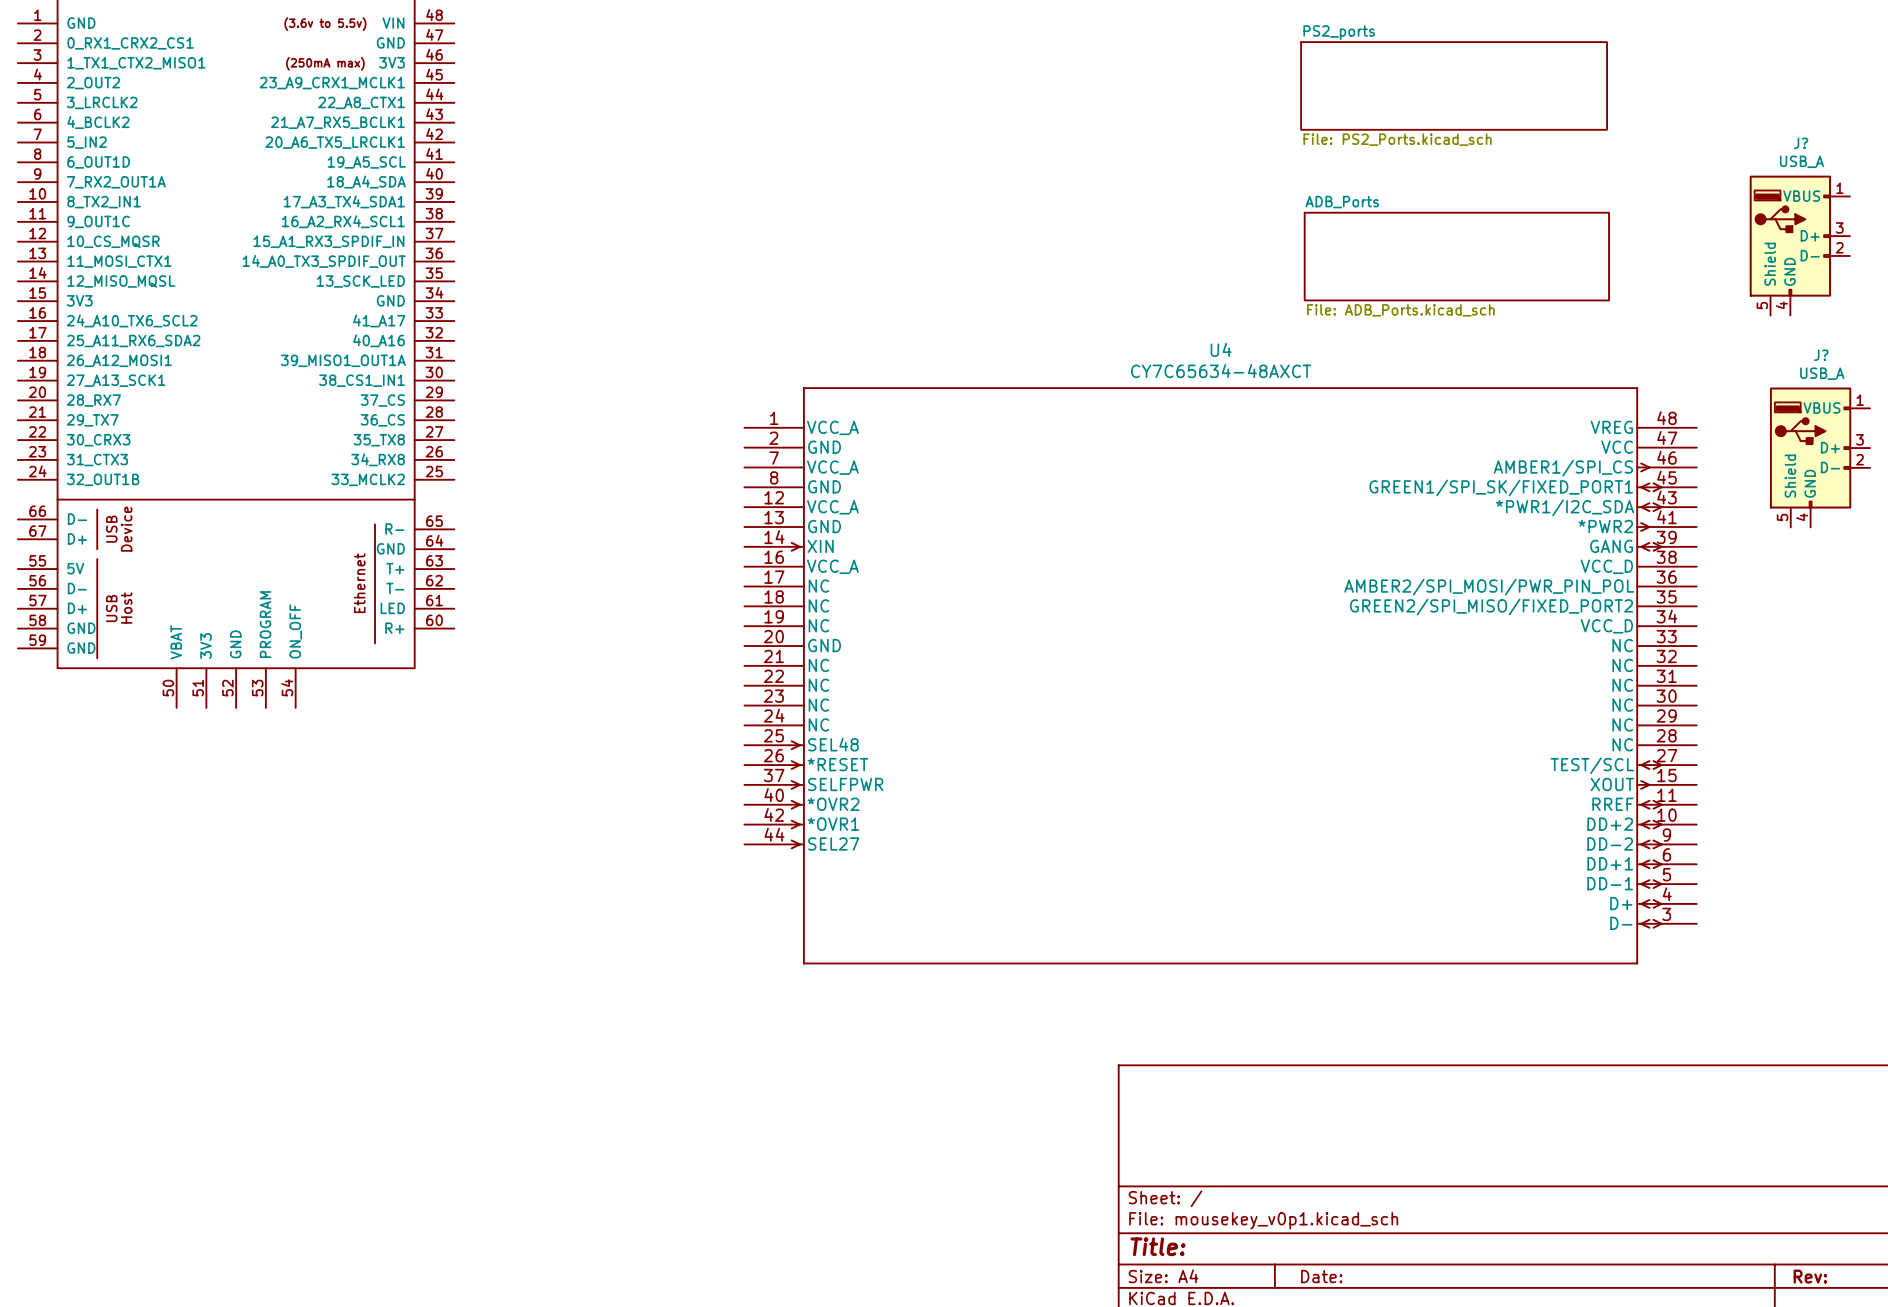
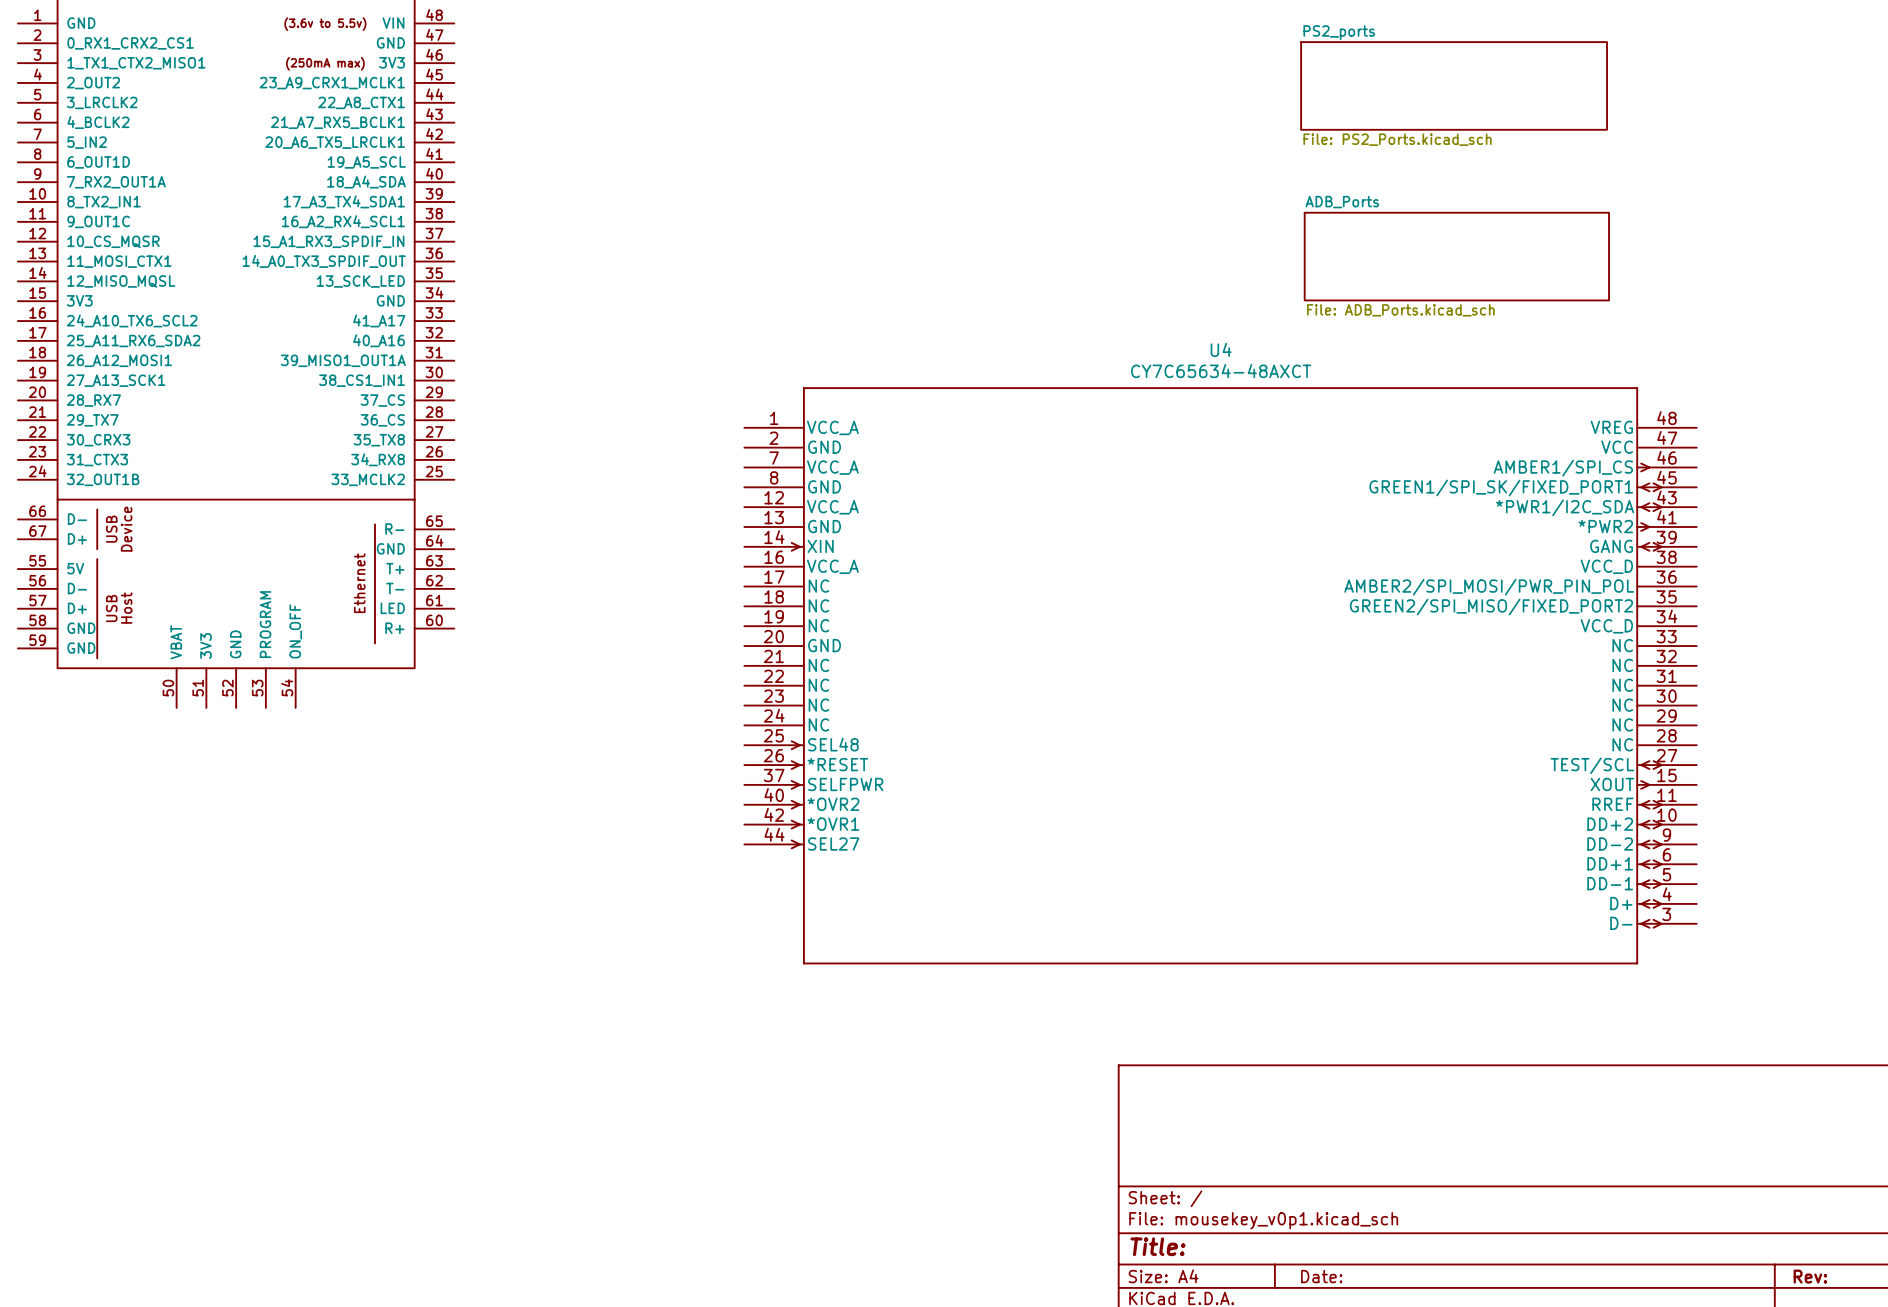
J?: USB_A (1799, 245) -> none
J?: USB_A (1820, 457) -> none

